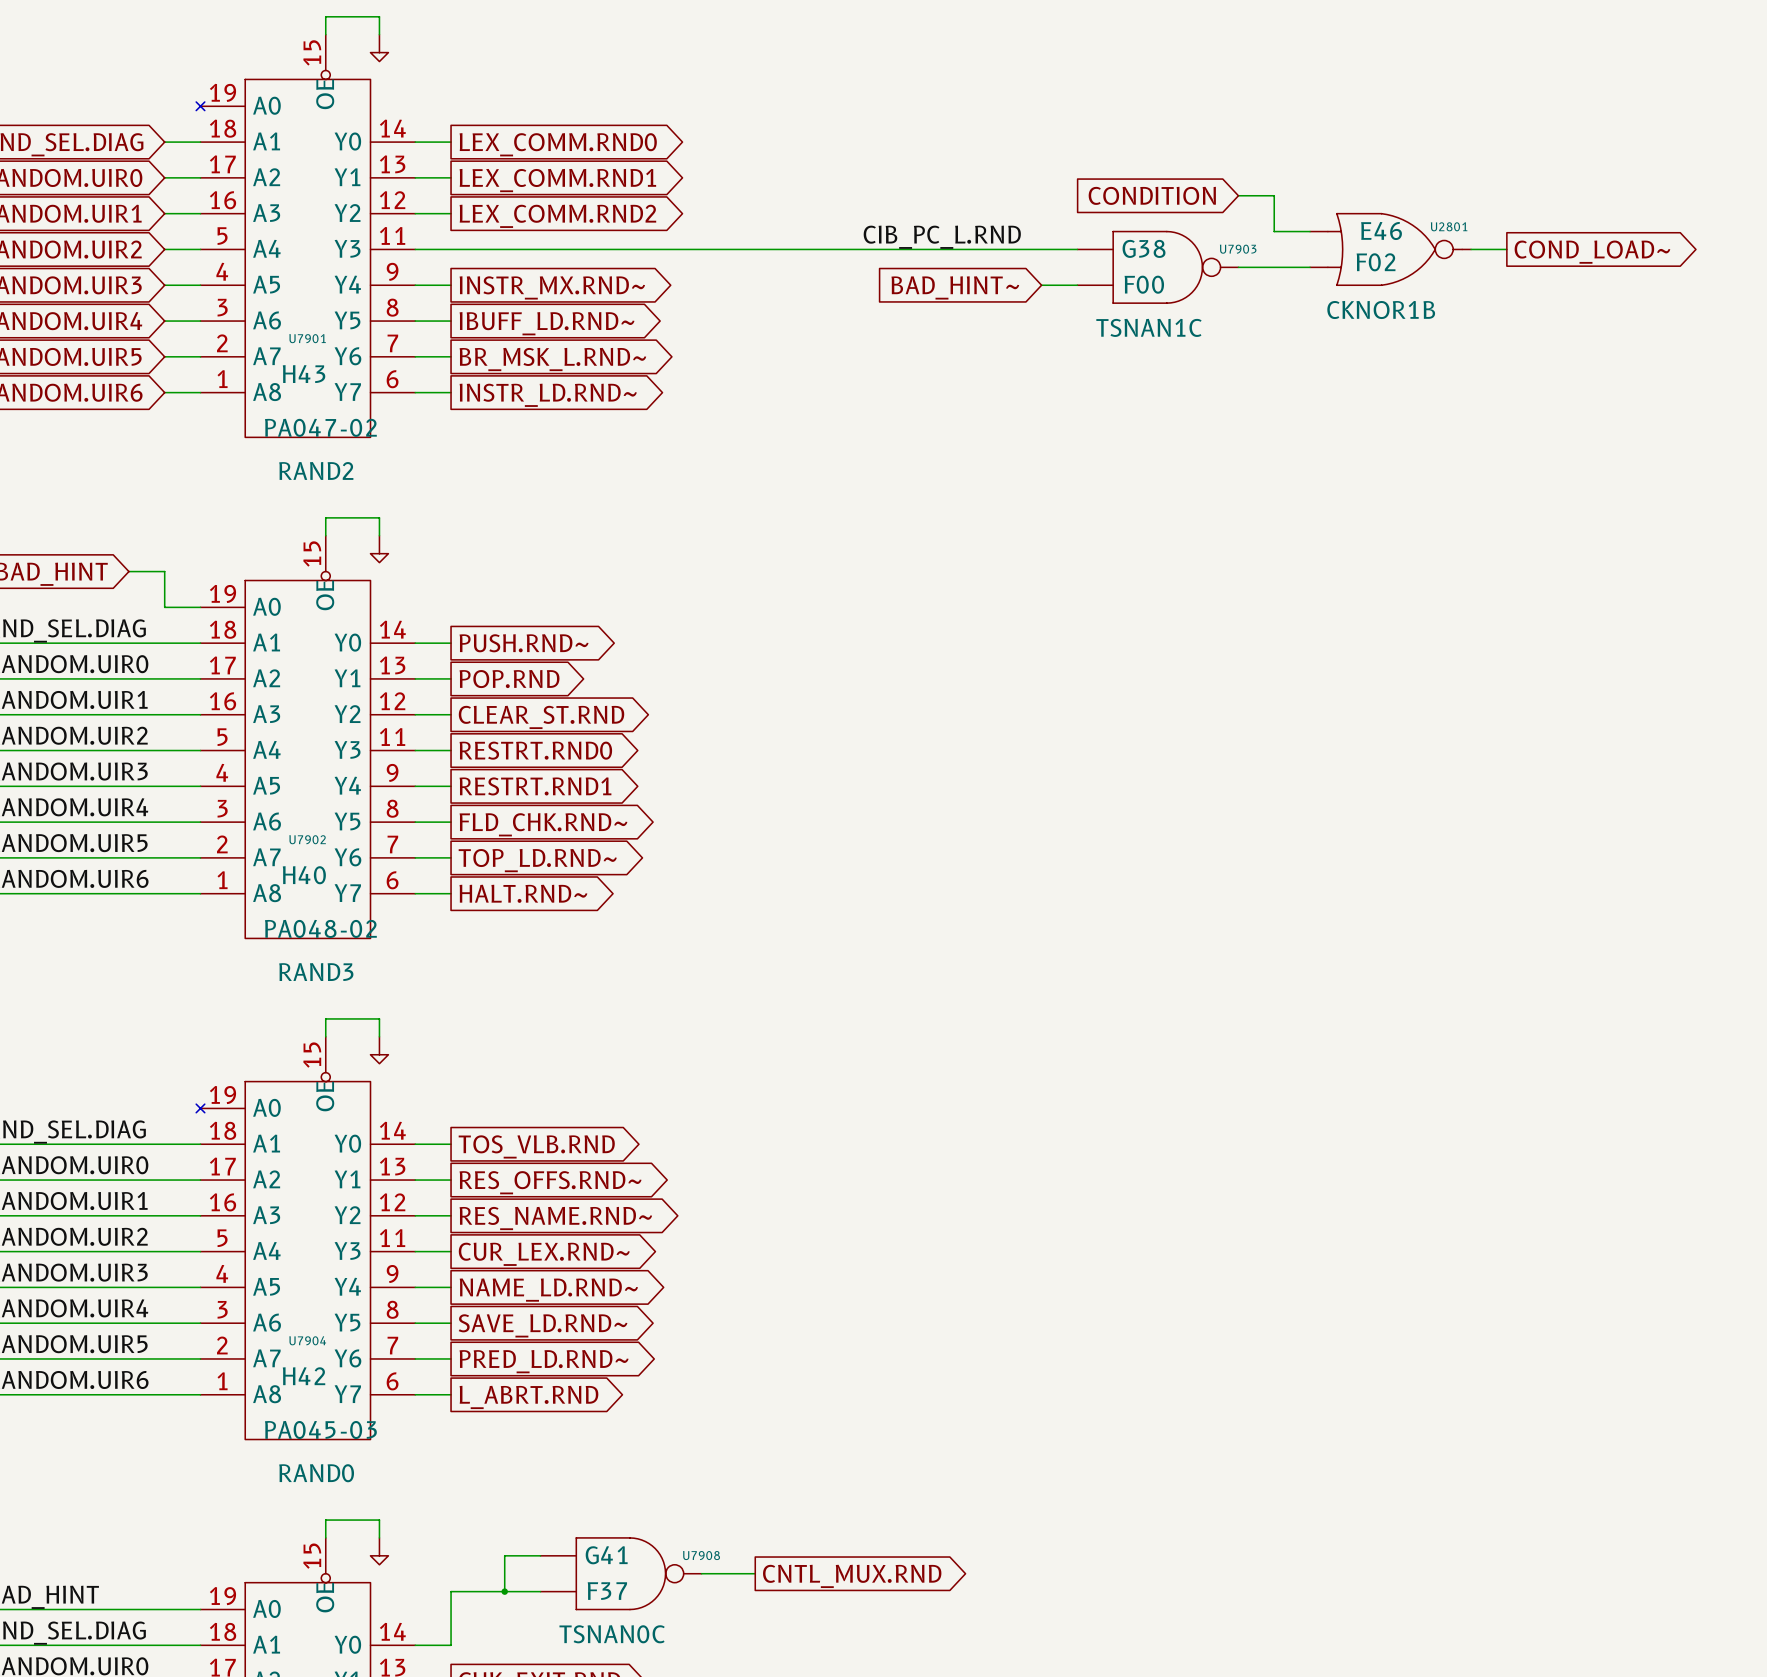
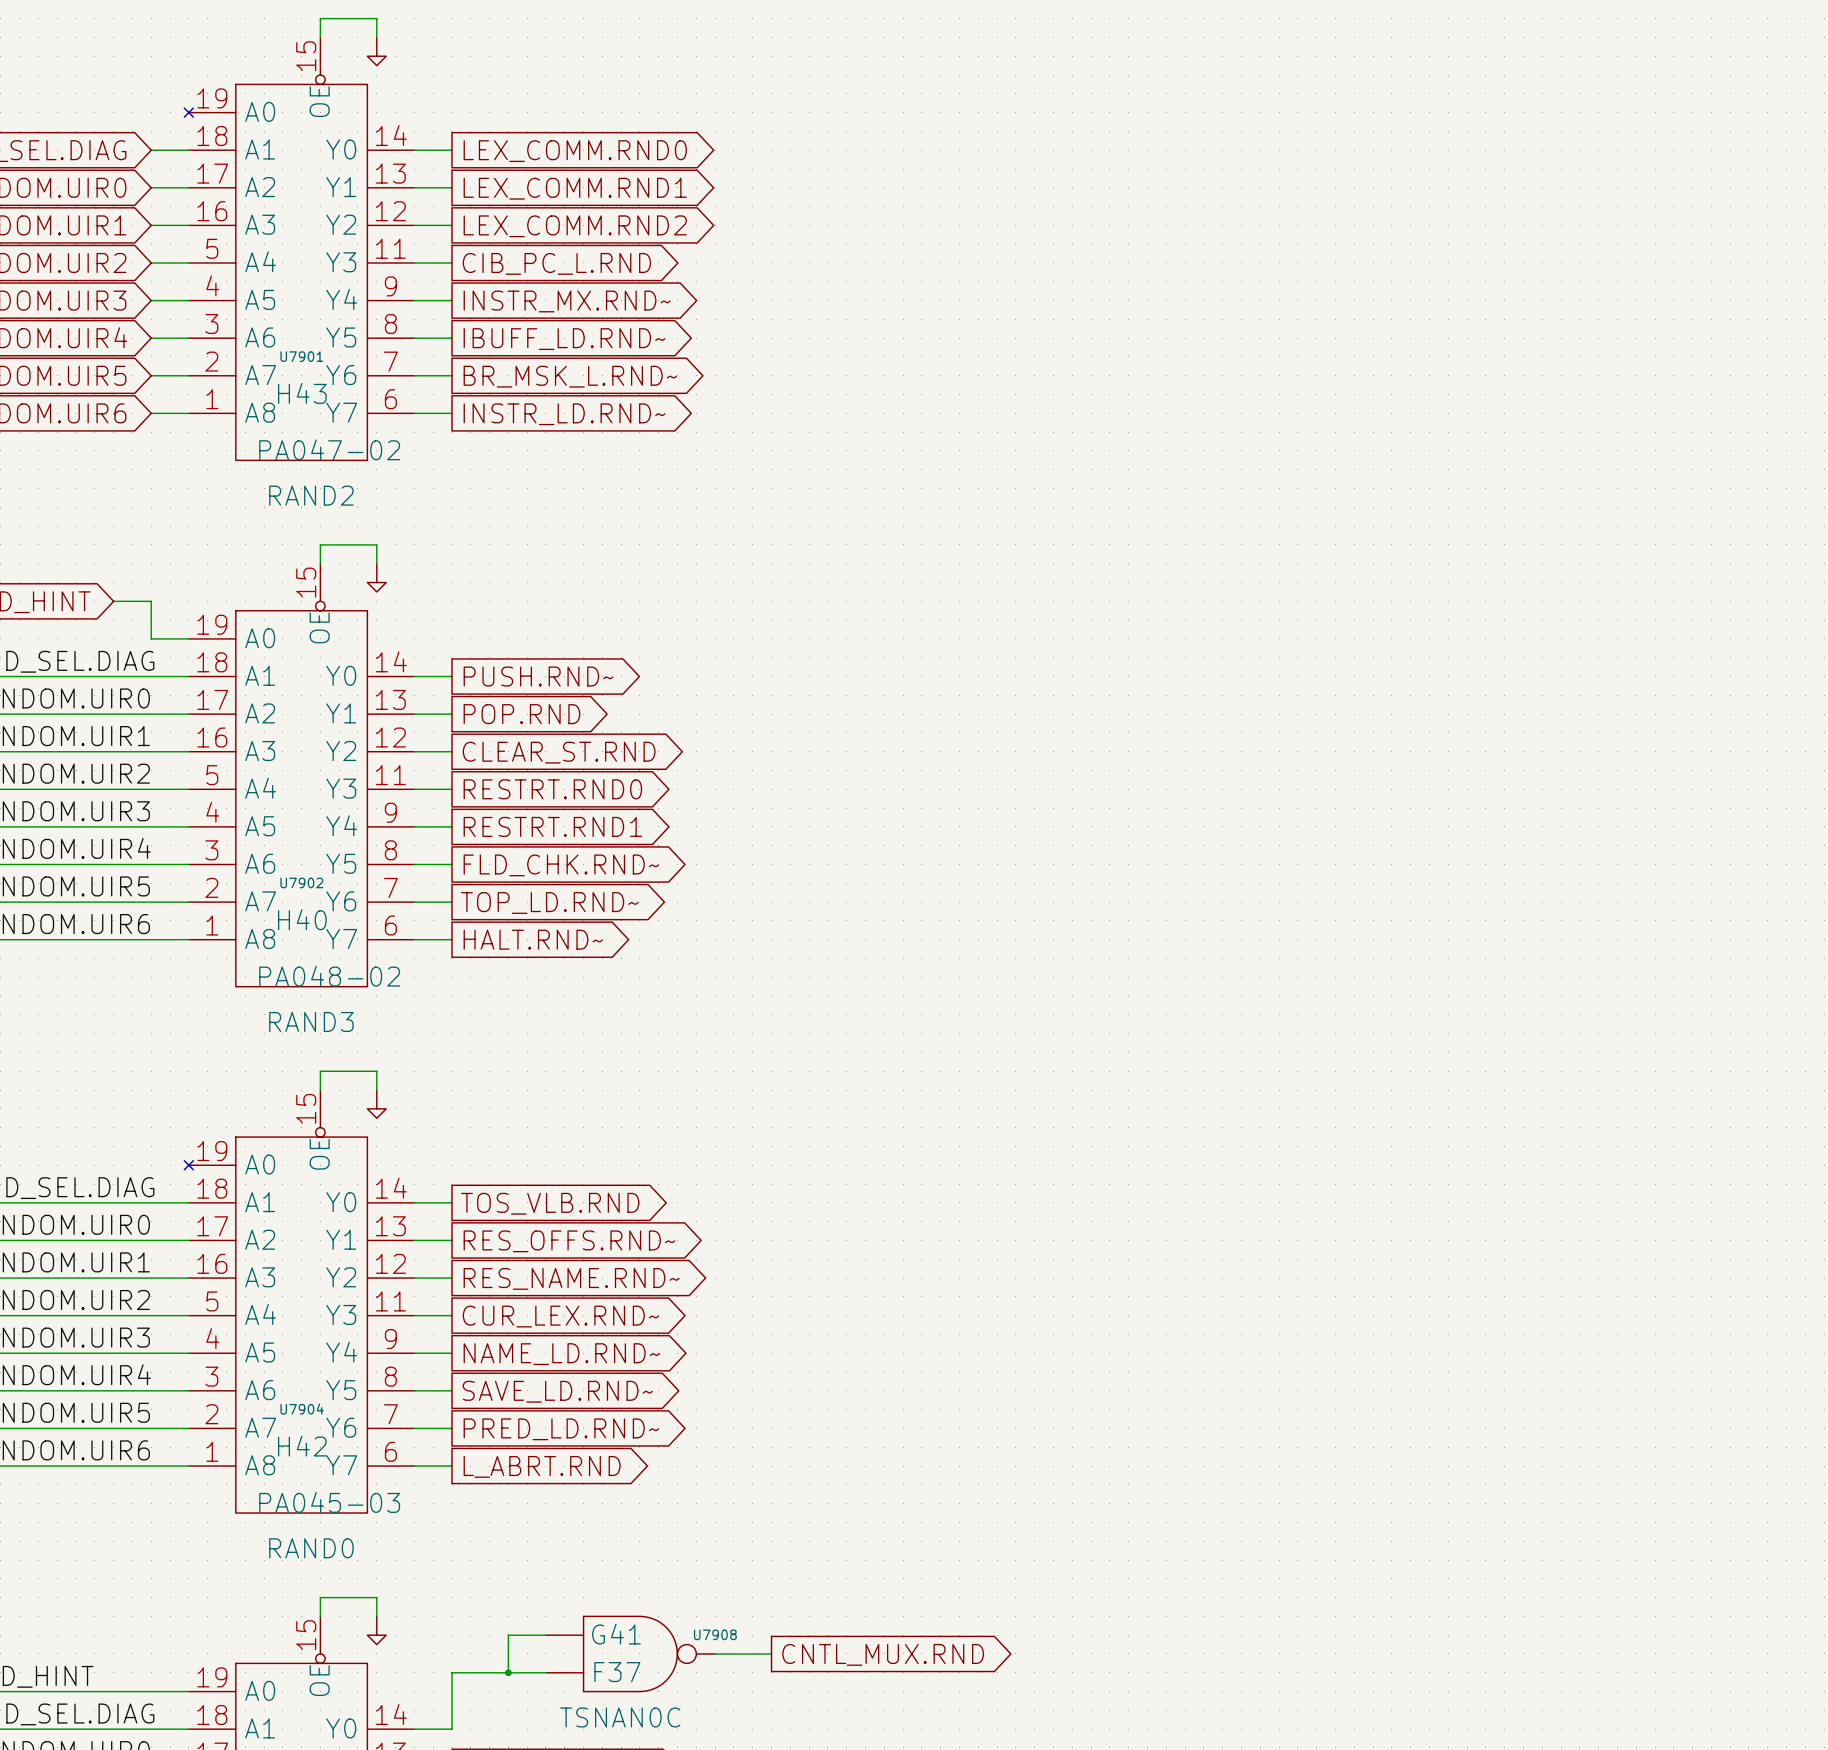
global label: CONDITION (1152, 195) -> none
wire: (1238, 195) (1274, 195) (1274, 231) (1310, 231) -> none
label: CIB_PC_L.RND (942, 237) -> none
wire: (451, 249) (1077, 249) -> none
U2801: F02 (1390, 249) -> none
wire: (1471, 249) (1506, 249) -> none
global label: none -> CIB_PC_L.RND (556, 263)
global label: COND_LOAD~ (1592, 252) -> none
U7903: F00 (1157, 267) -> none
wire: (1238, 267) (1310, 267) -> none
wire: (1041, 285) (1077, 285) -> none
global label: BAD_HINT~ (955, 287) -> none

